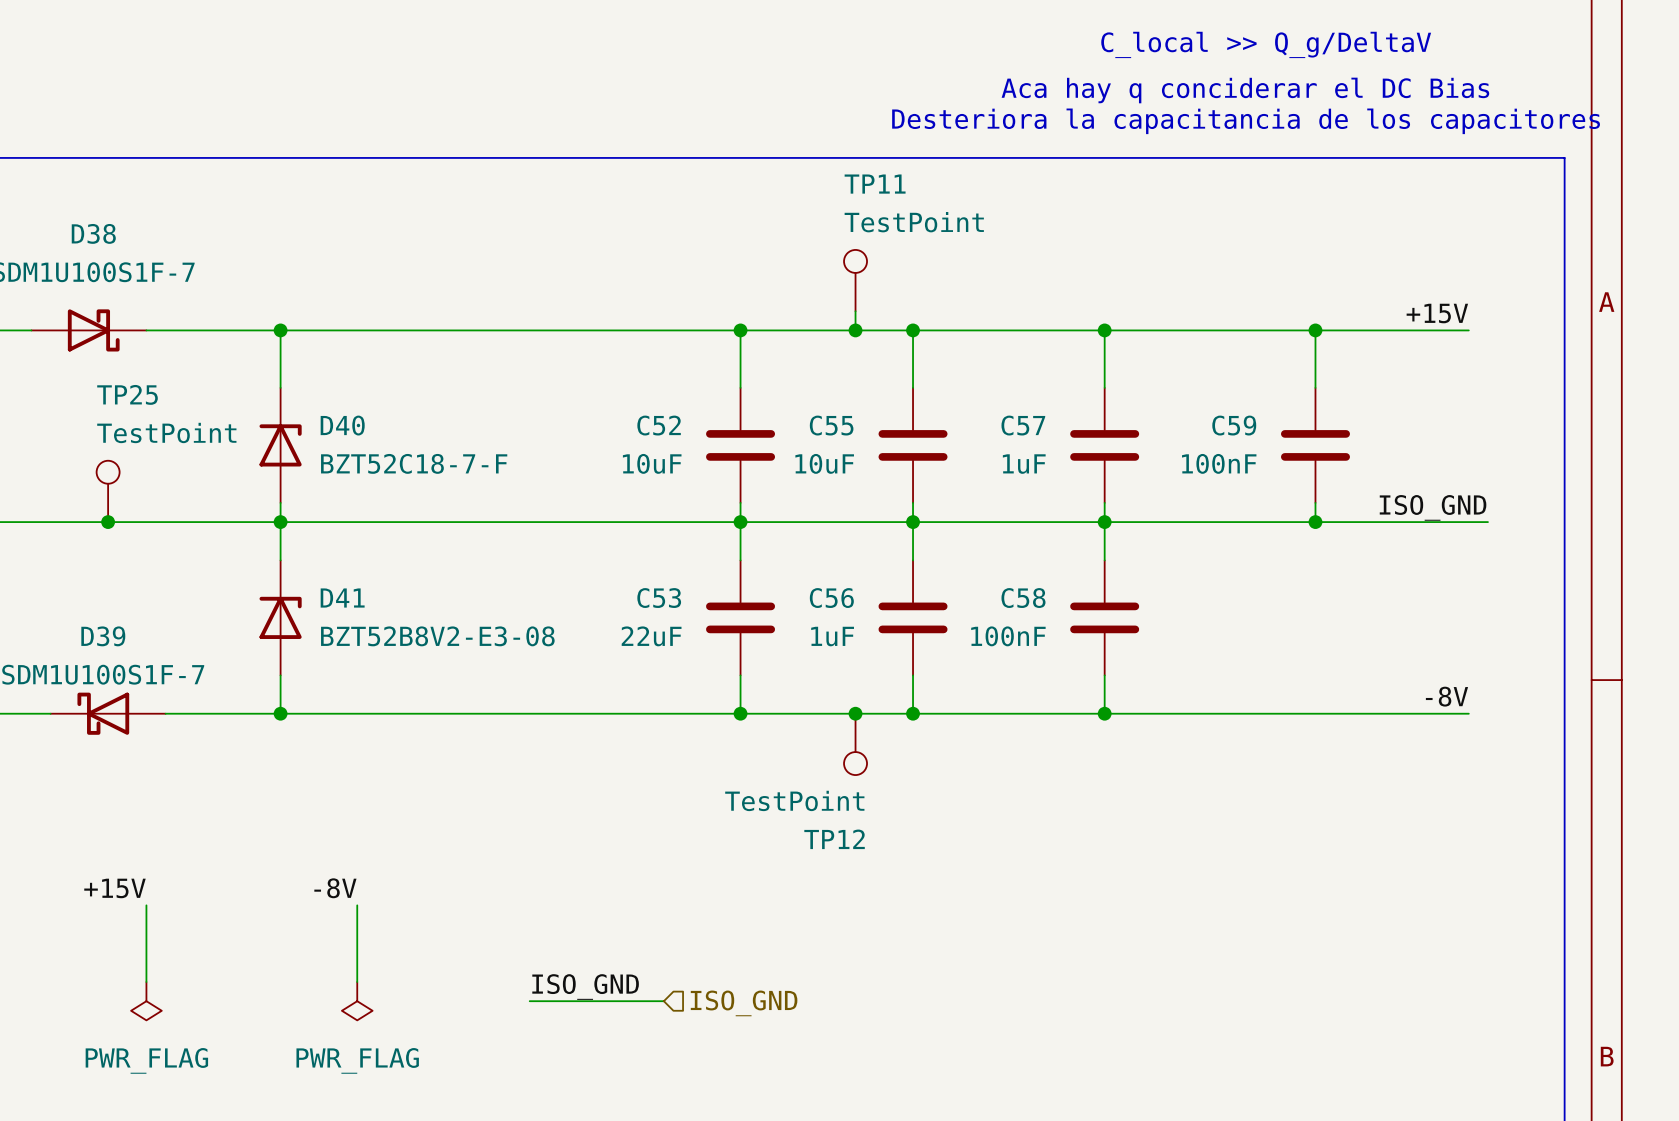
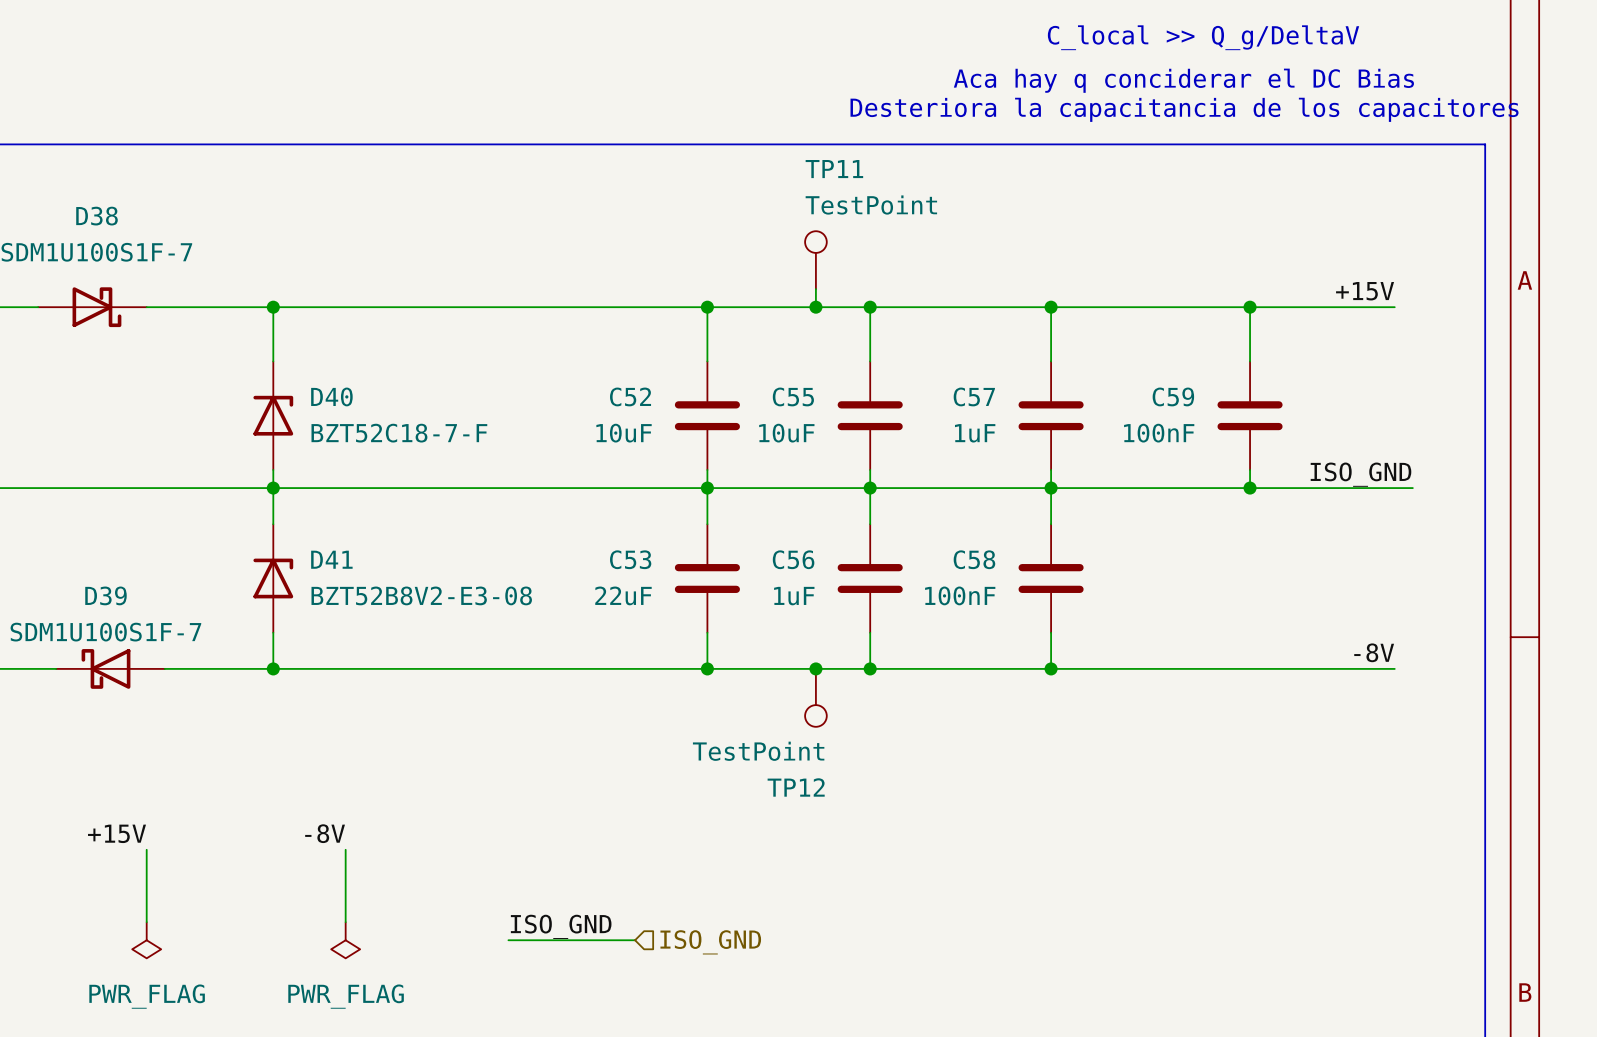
TP25: TestPoint (108, 491) -> none
junction: (108, 522) -> none

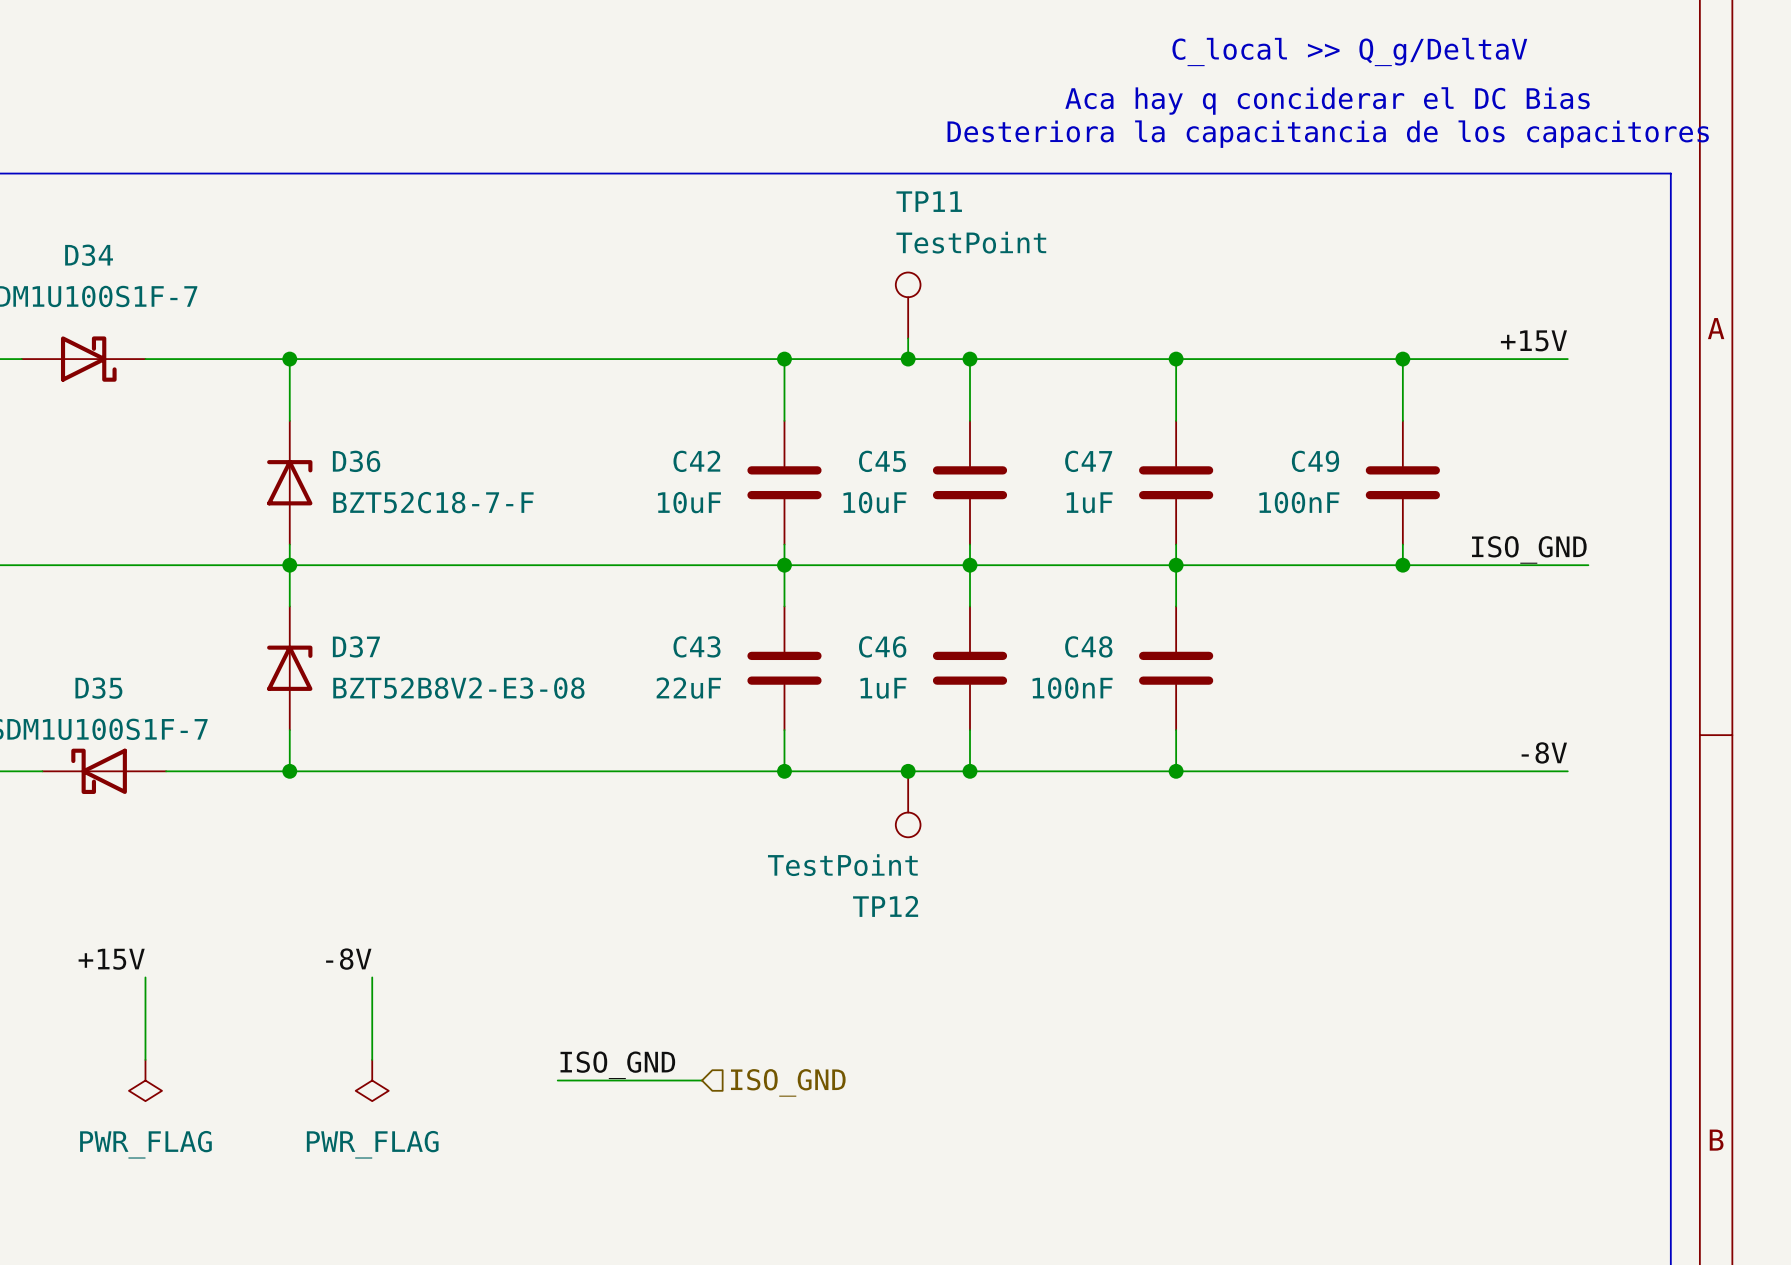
D38 name: D38 (96, 216) -> D34 (89, 255)
D40 name: D40 (331, 396) -> D36 (356, 461)
C52 name: C52 (630, 396) -> C42 (696, 461)
C55 name: C55 (793, 396) -> C45 (882, 461)
C57 name: C57 (974, 396) -> C47 (1088, 461)
C59 name: C59 (1173, 396) -> C49 (1315, 461)
D41 name: D41 (331, 559) -> D37 (356, 646)
C53 name: C53 (630, 559) -> C43 (697, 646)
C56 name: C56 (793, 559) -> C46 (882, 646)
C58 name: C58 (974, 559) -> C48 (1088, 646)
D39 name: D39 (105, 595) -> D35 (98, 688)

